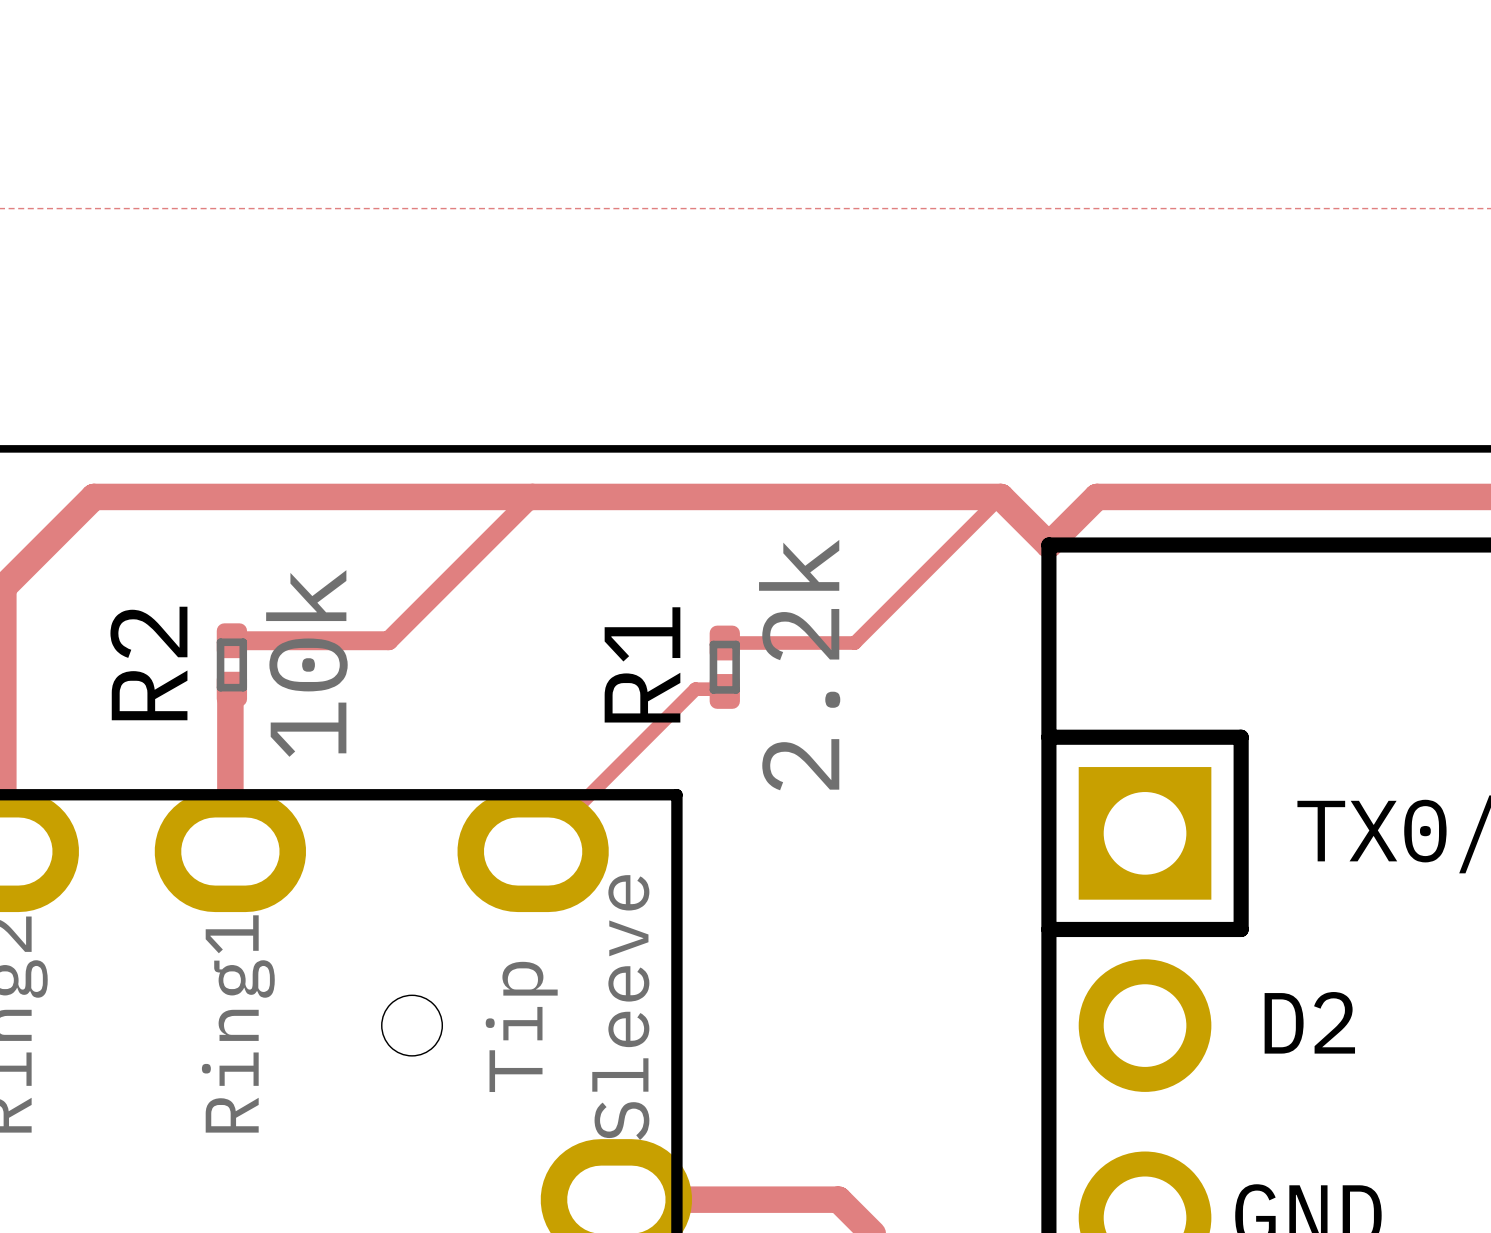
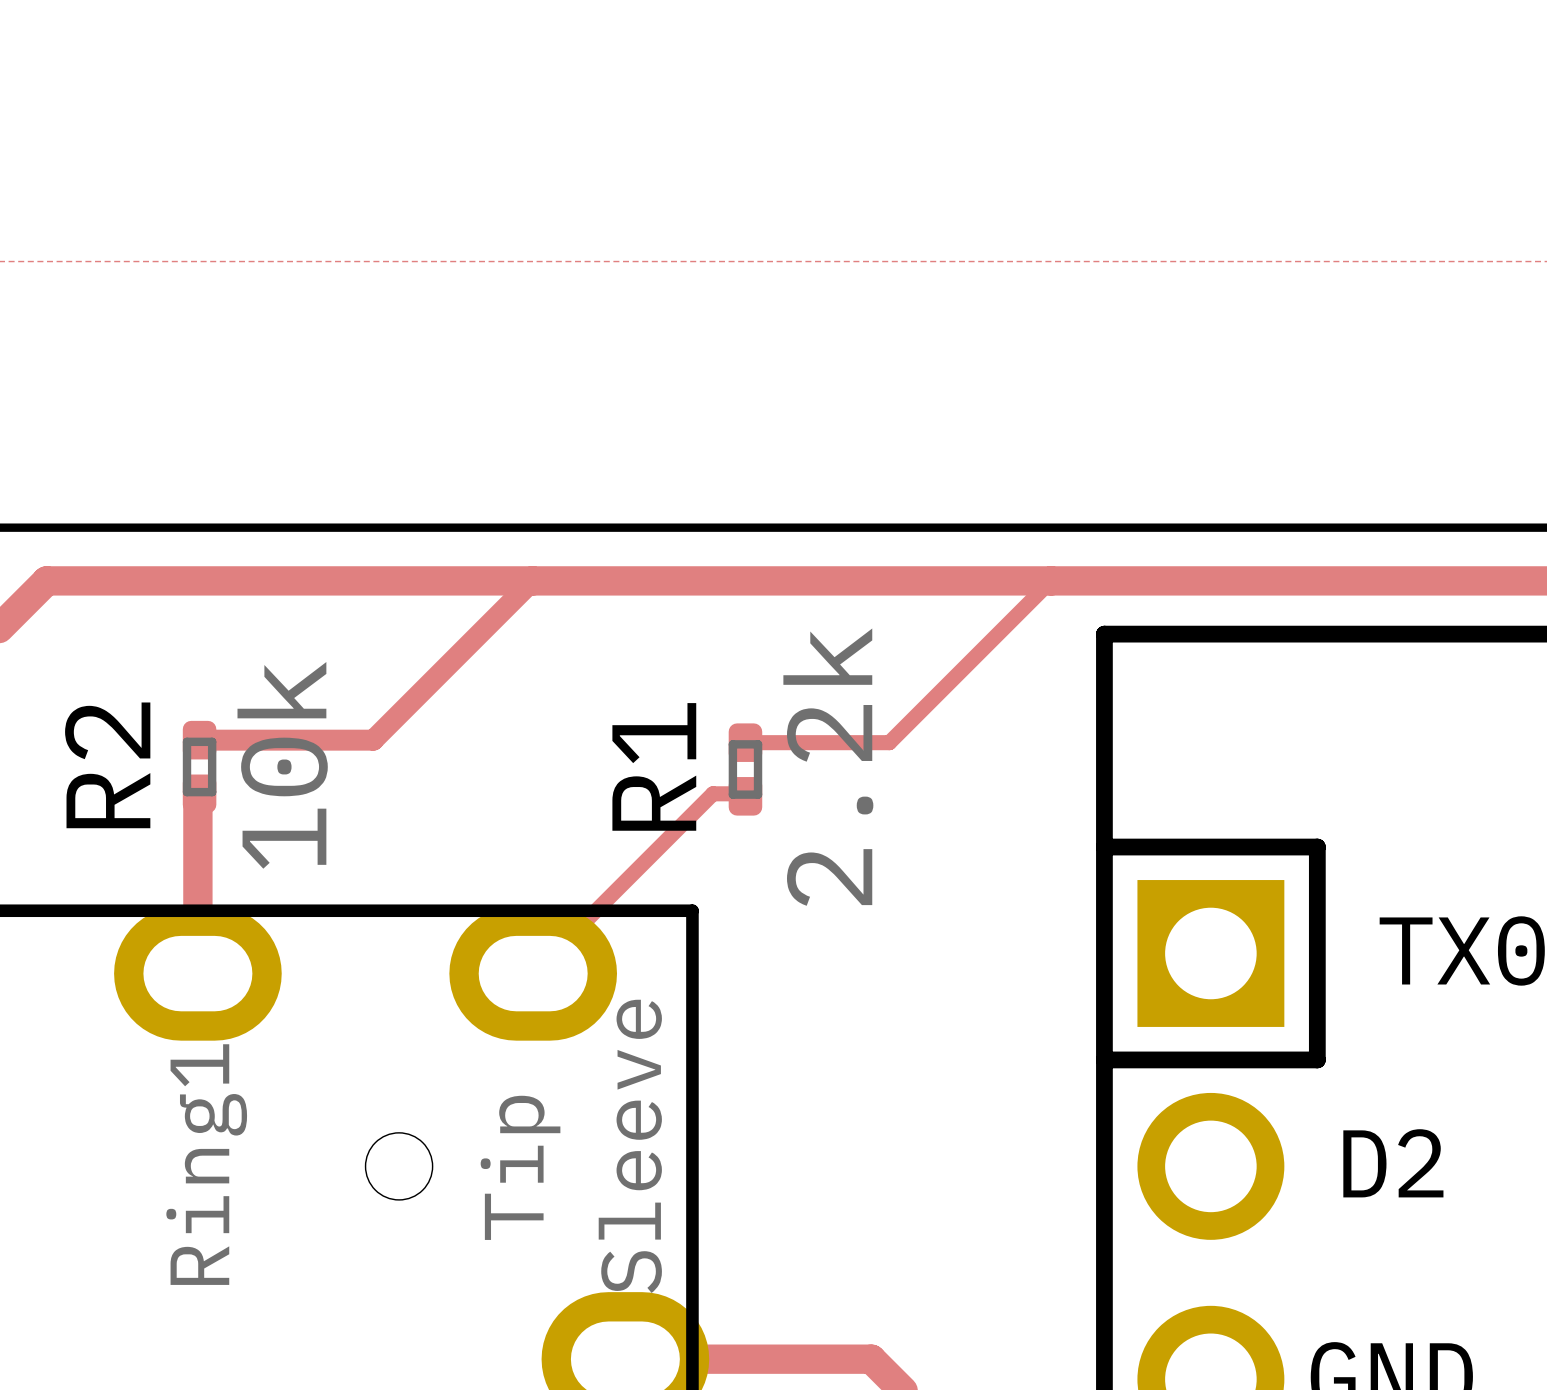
track: (1000, 496) (1048, 545) (1096, 496) -> (1051, 580) (1157, 580)

